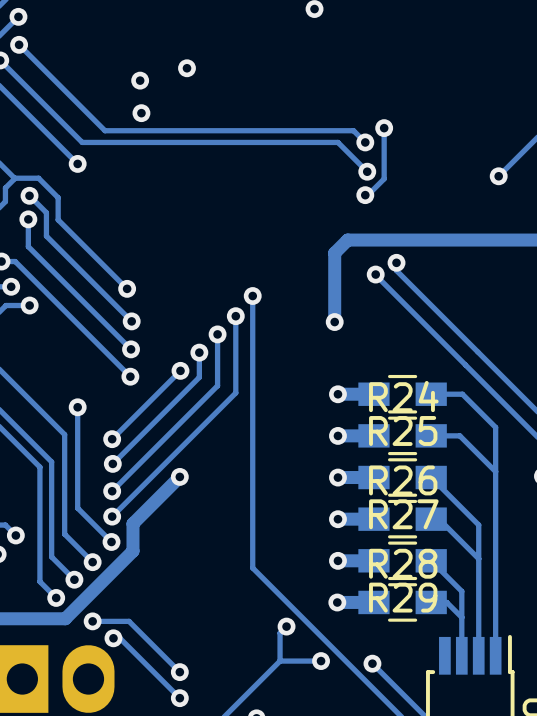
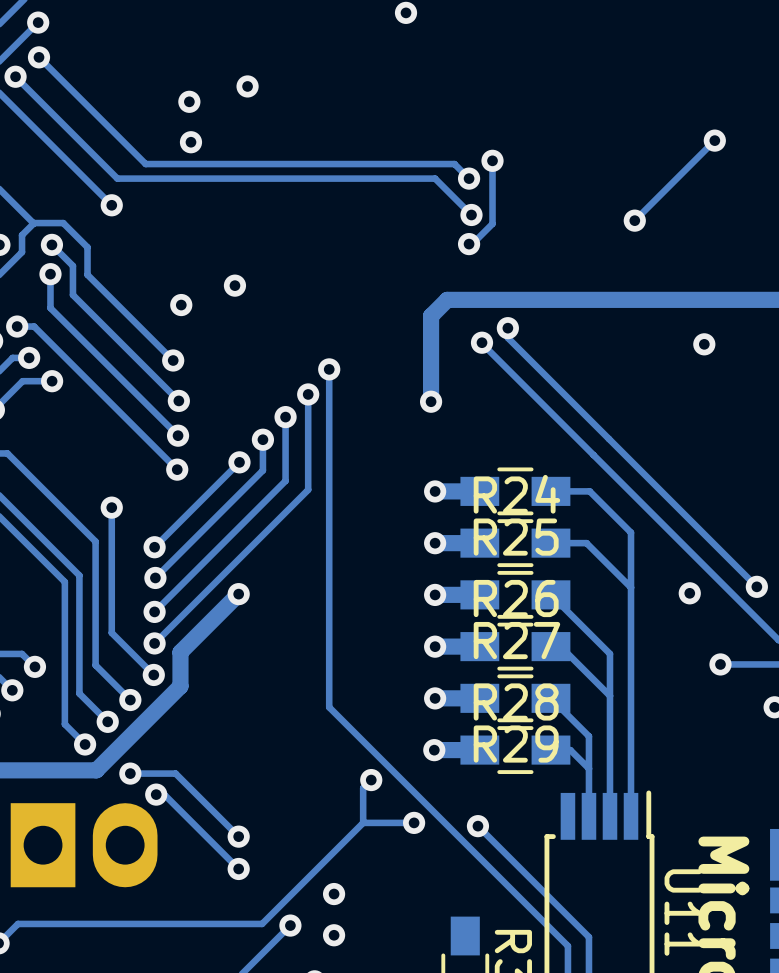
via: none -> (234, 285)
via: none -> (181, 305)

